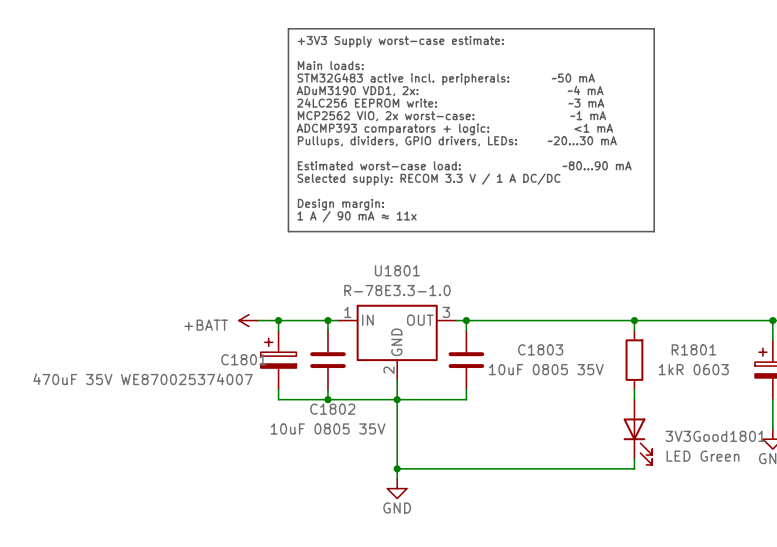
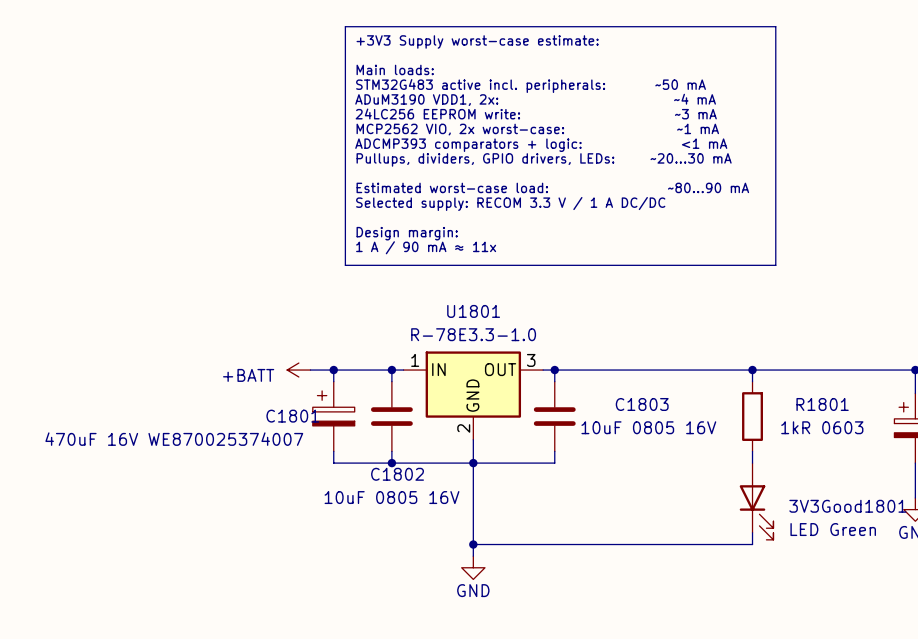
C1803 value: 10uF 0805 35V (546, 369) -> 10uF 0805 16V (648, 427)
C1801 value: 470uF 35V WE870025374007 (143, 379) -> 470uF 16V WE870025374007 (174, 439)
C1802 value: 10uF 0805 35V (328, 428) -> 10uF 0805 16V (391, 497)

